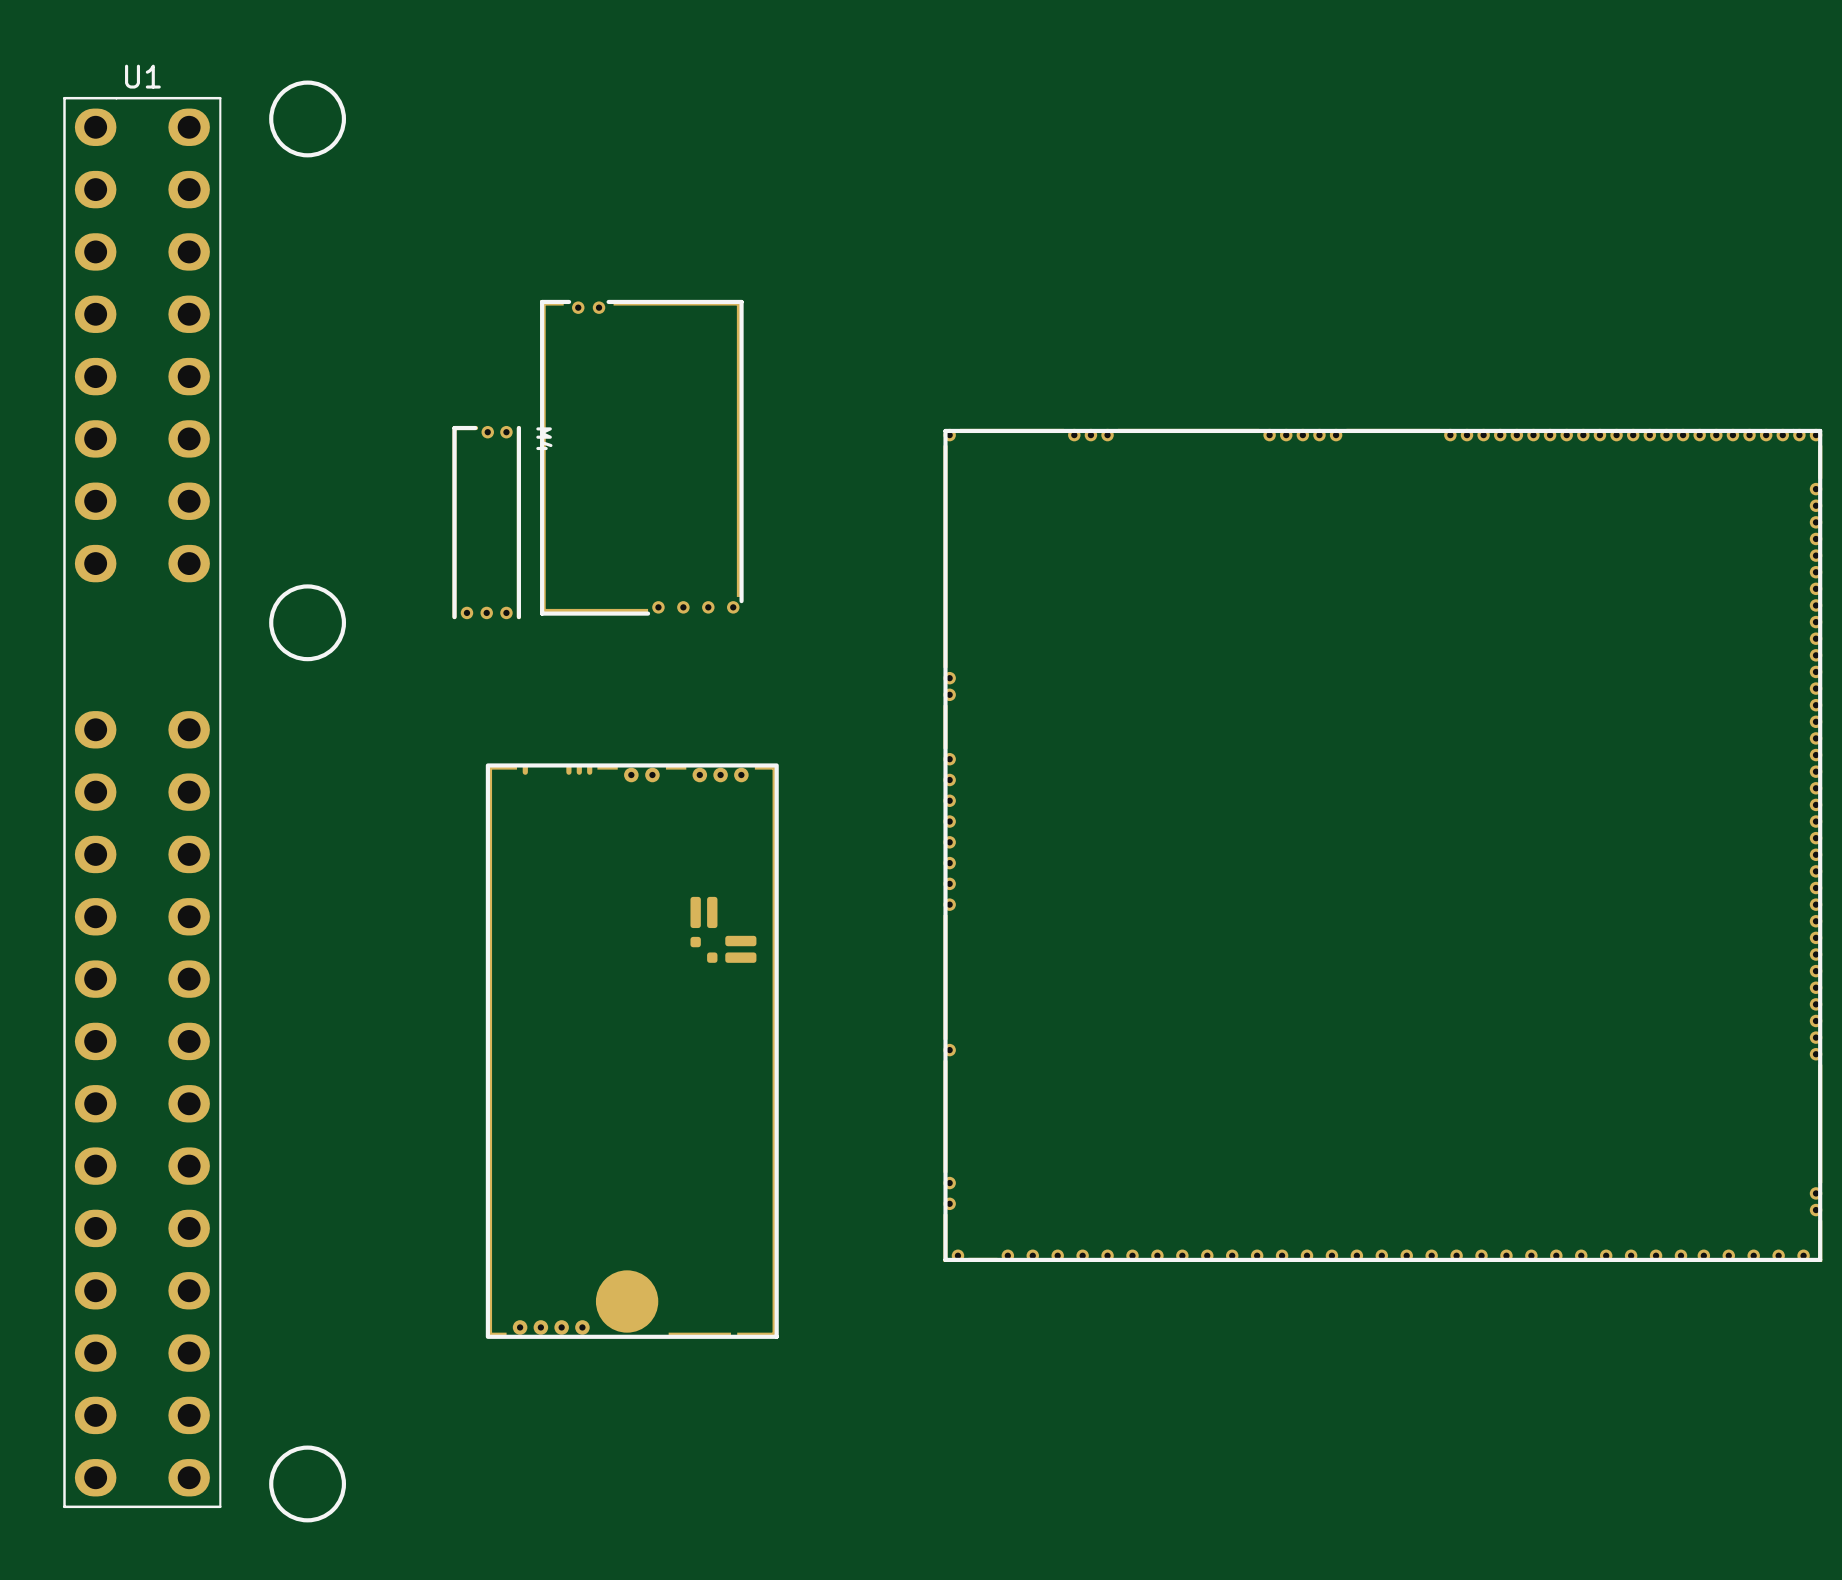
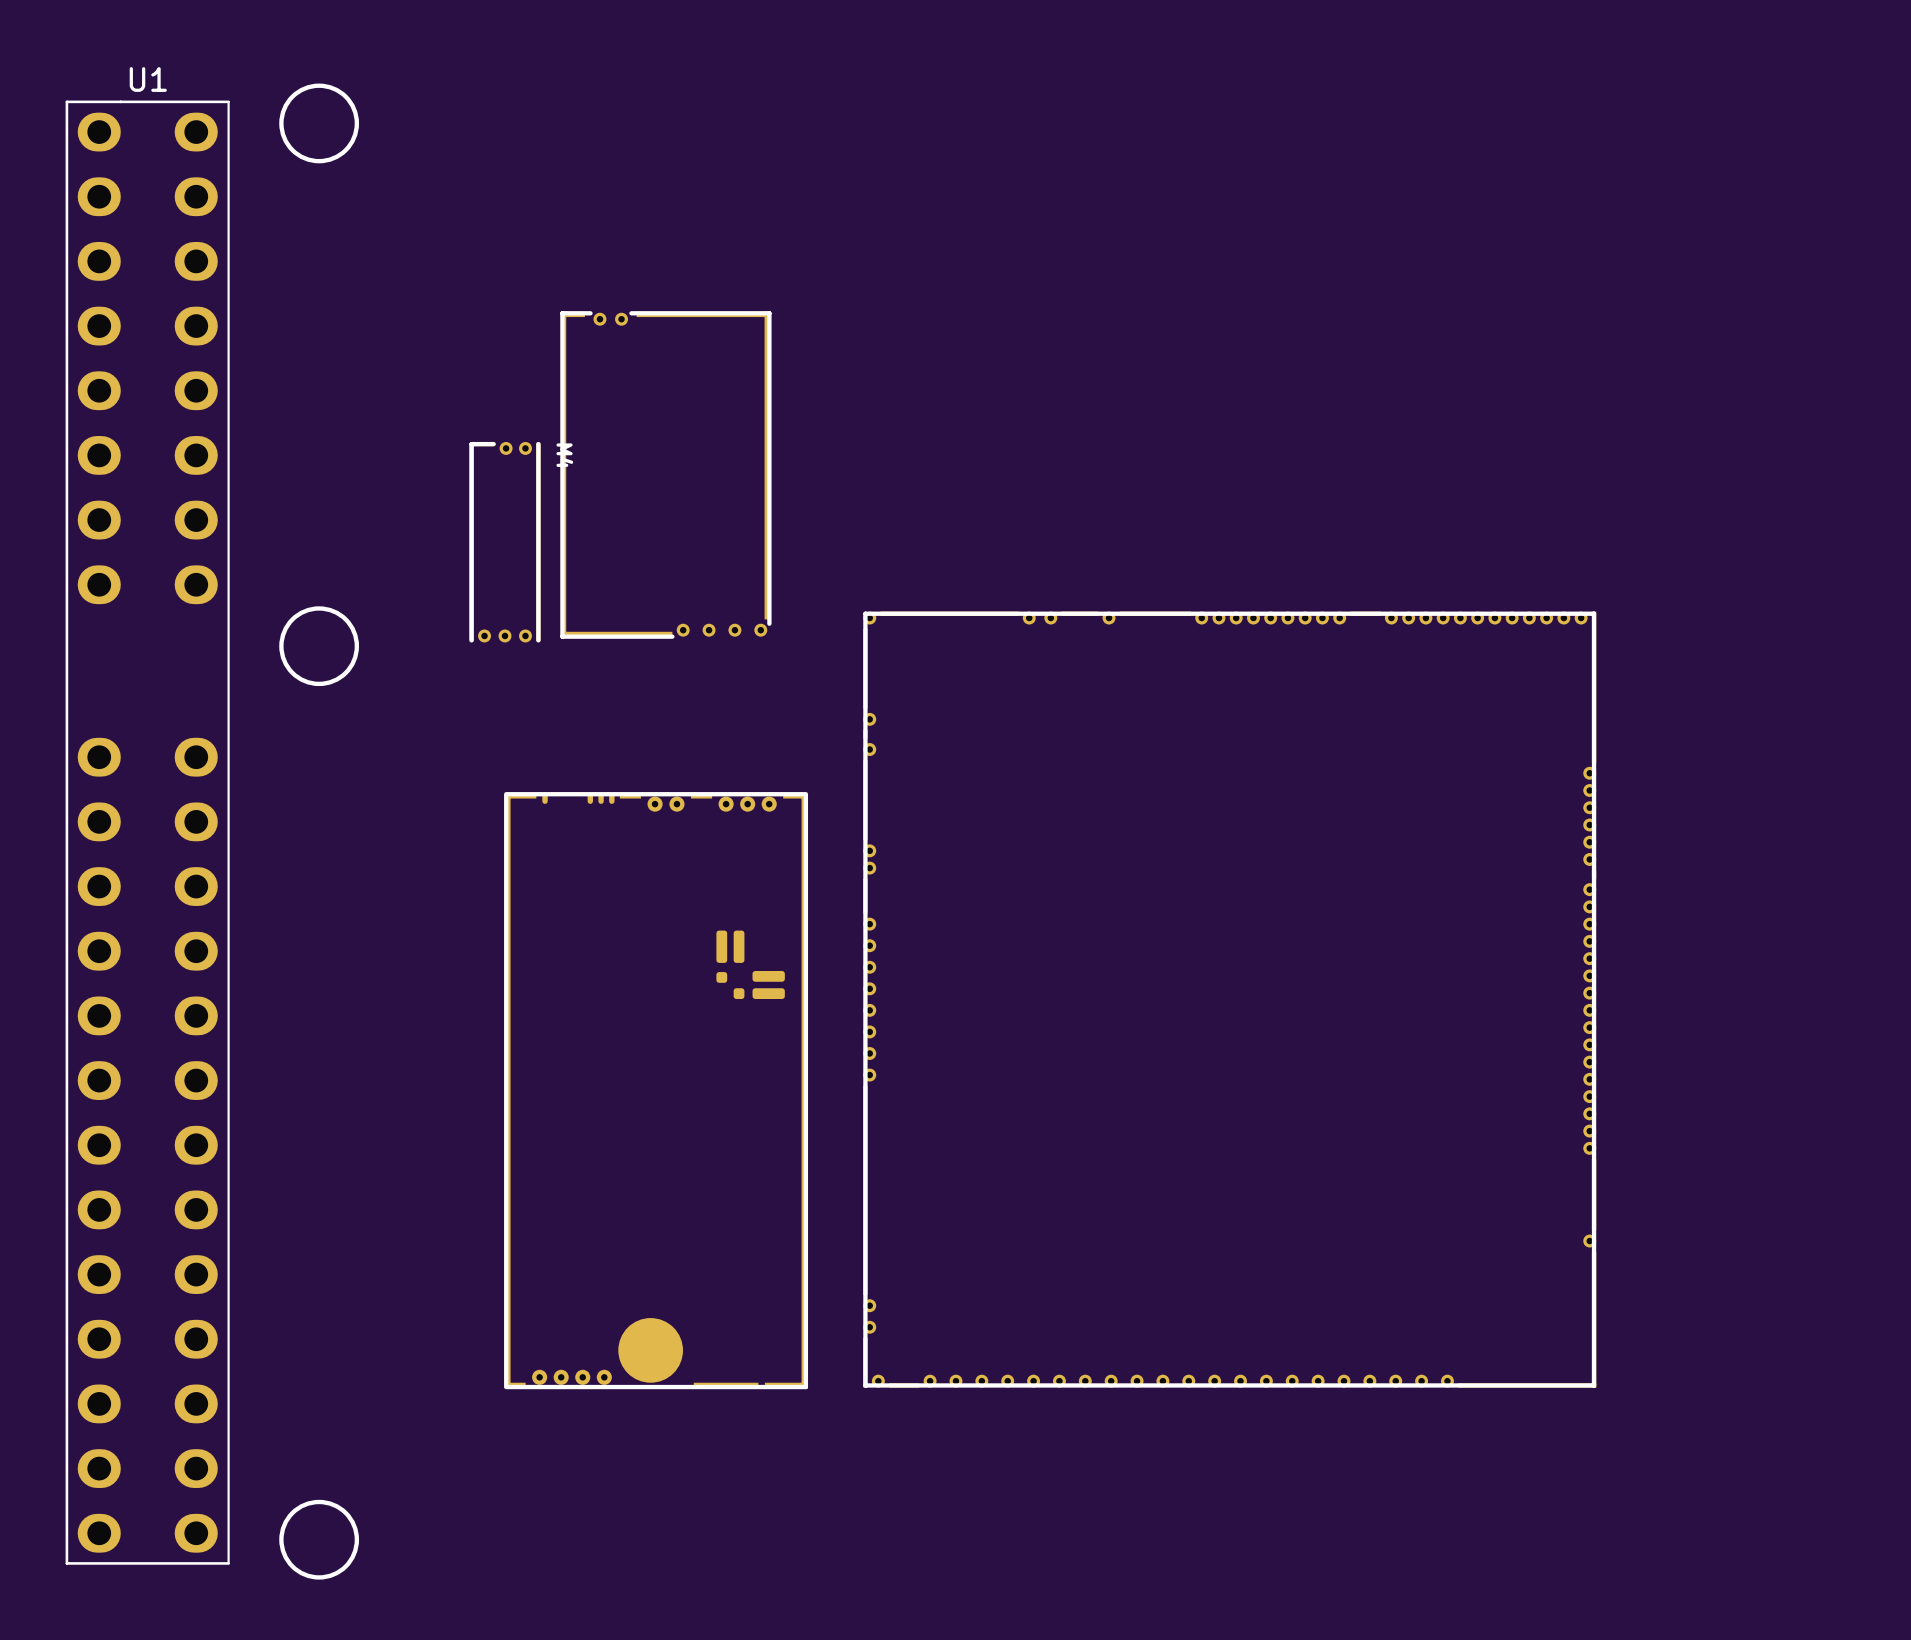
part: (1382, 845) -> none
part: none -> (1229, 999)

